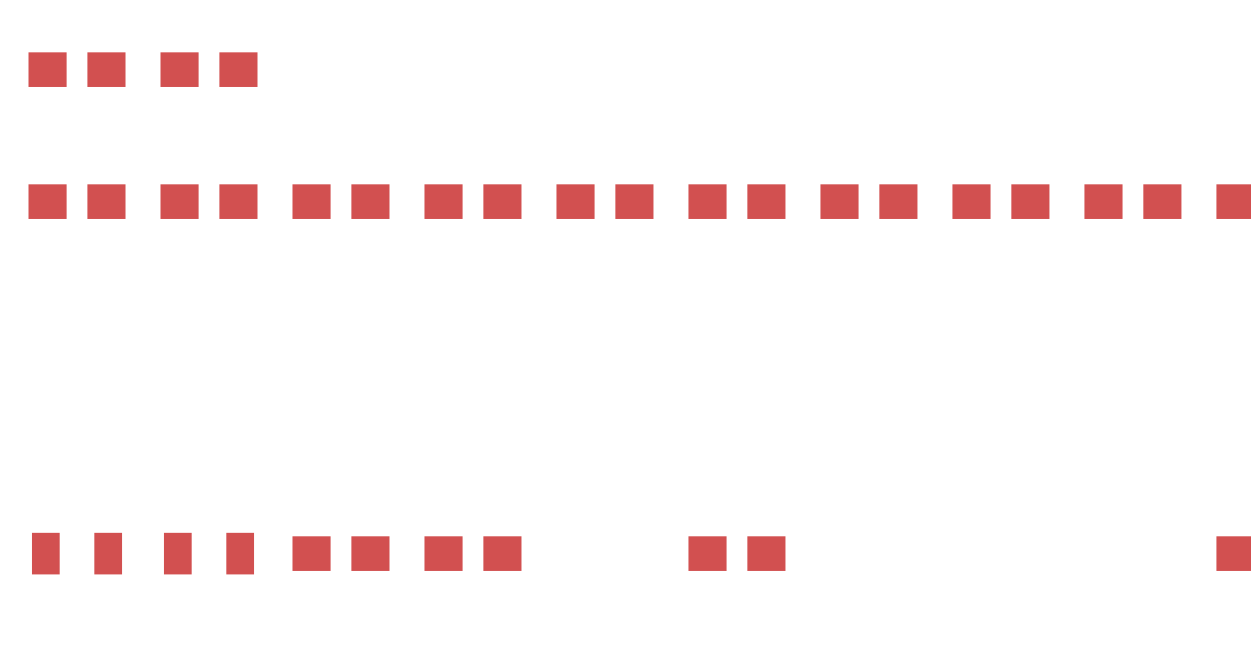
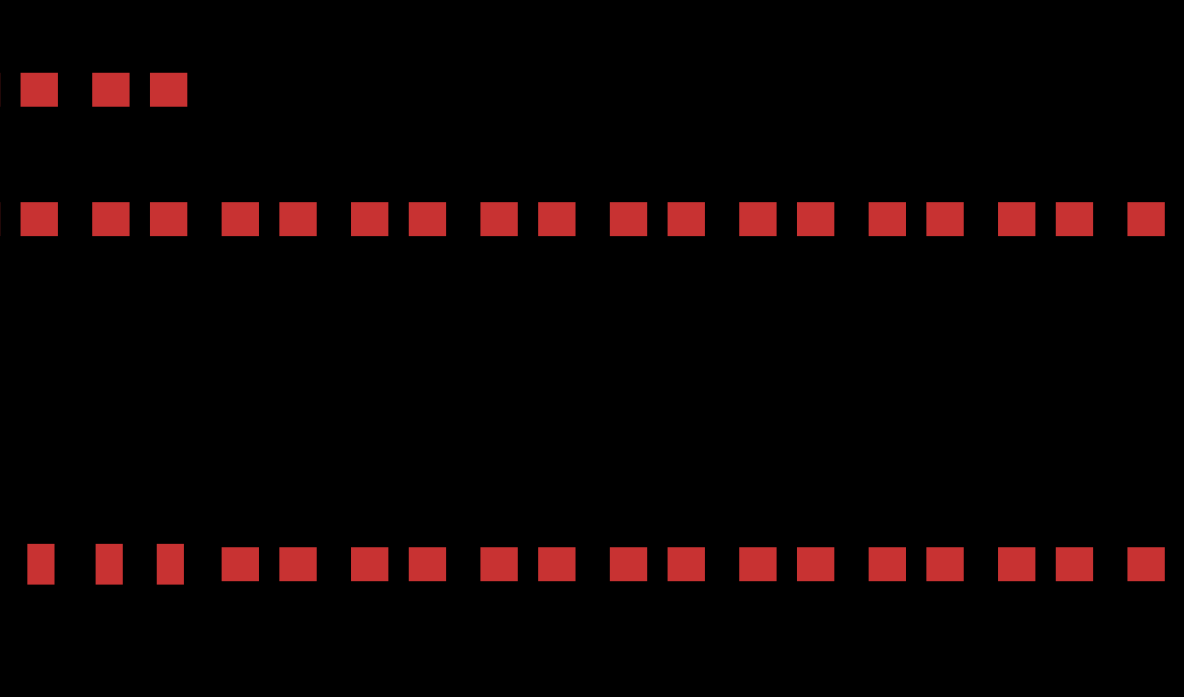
part: none -> (527, 564)
part: none -> (786, 564)
part: none -> (916, 564)
part: none -> (1045, 564)

